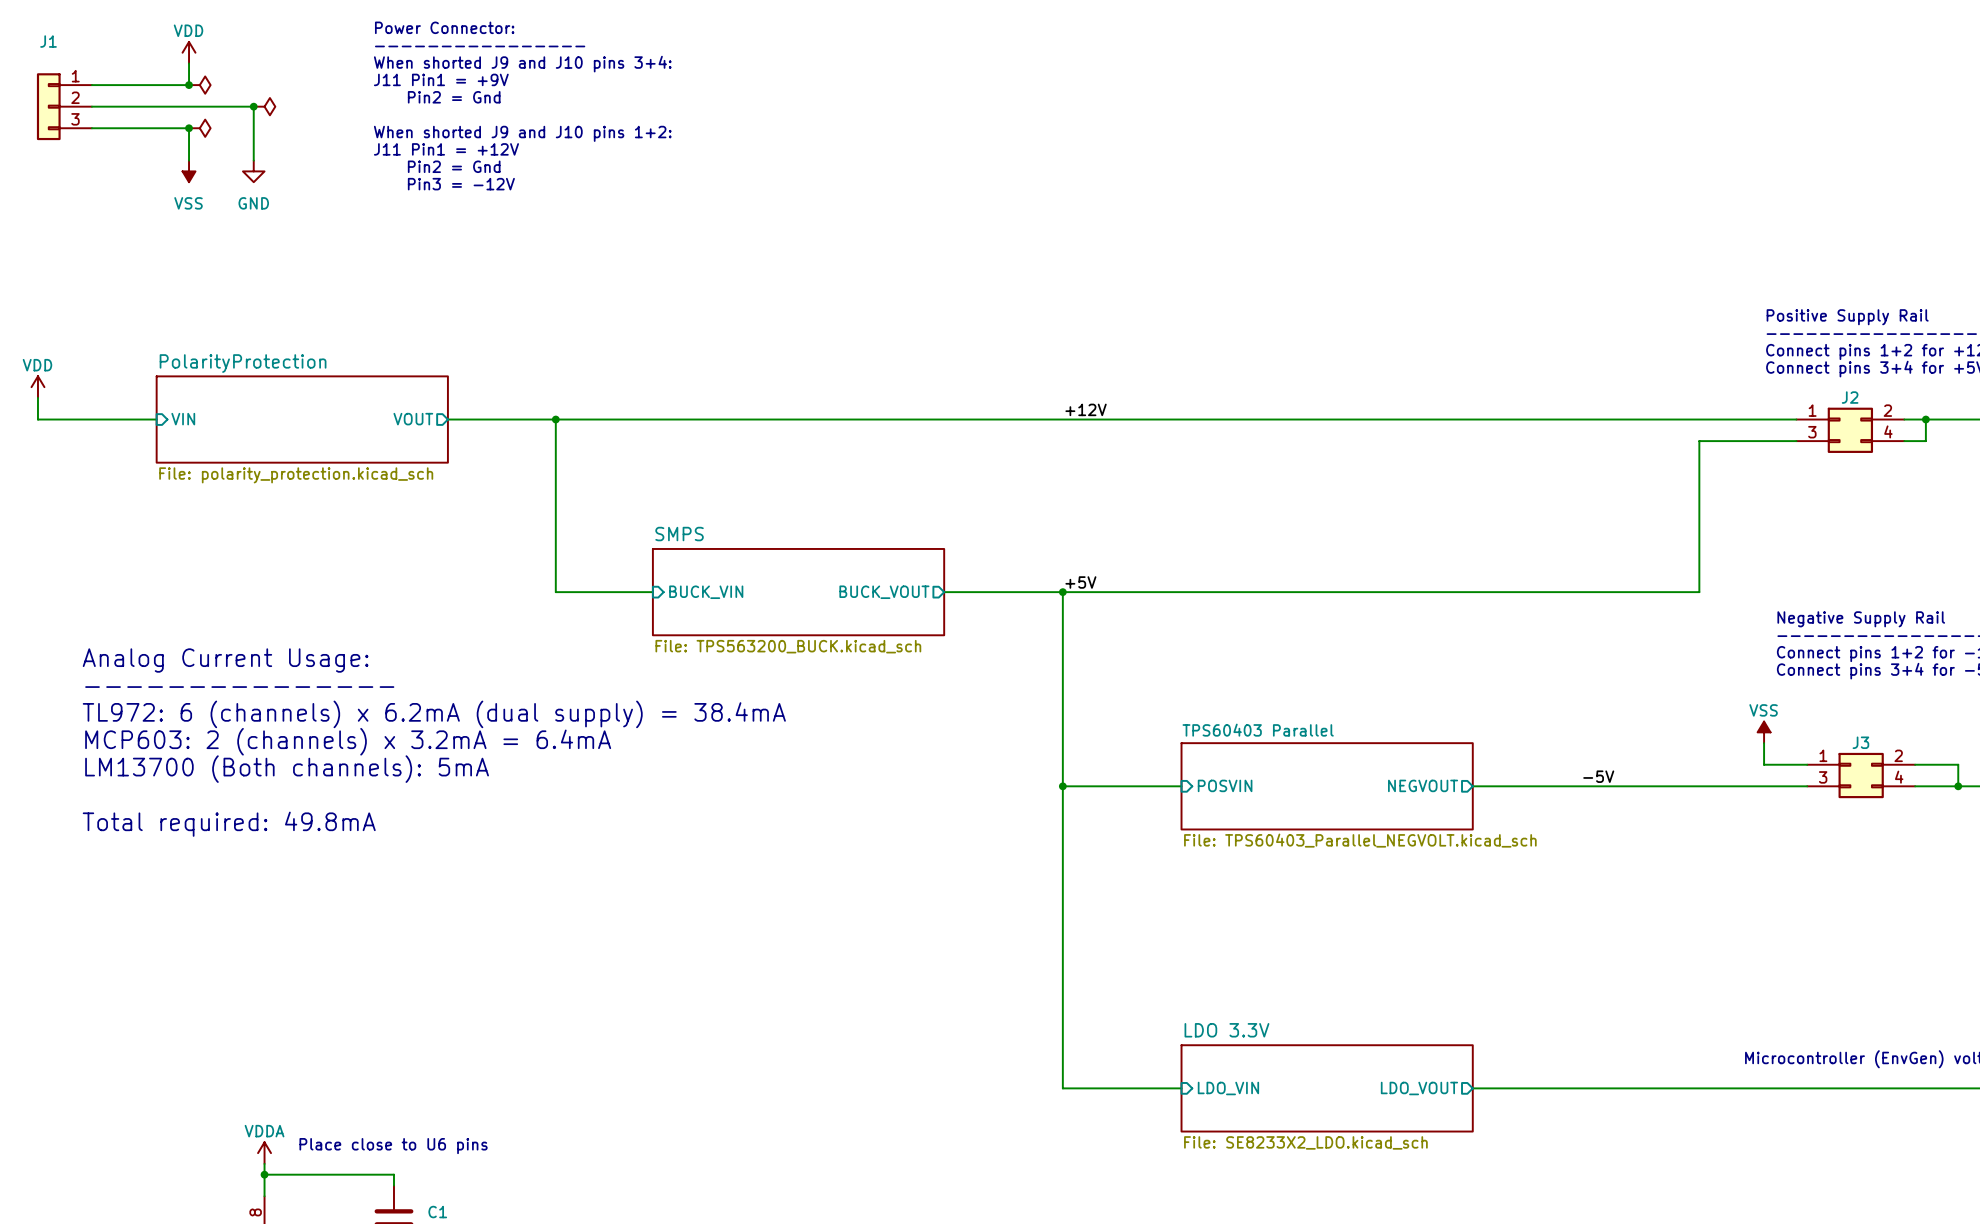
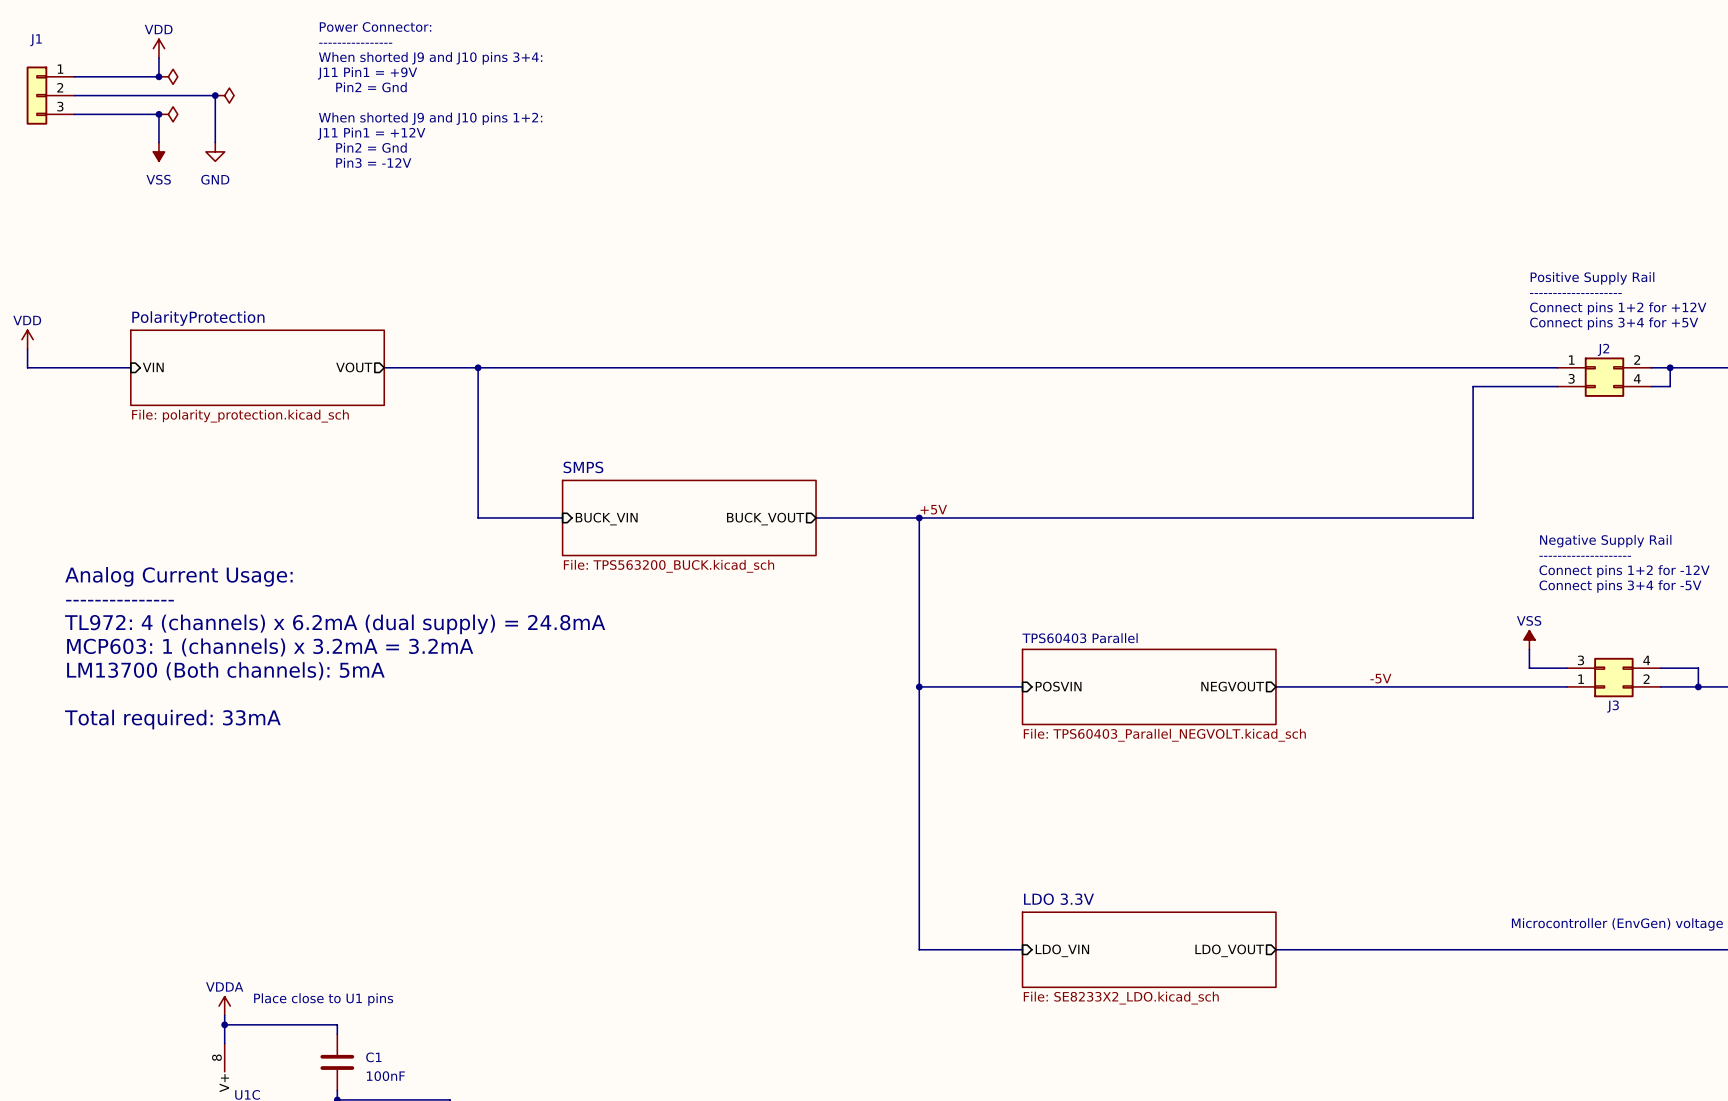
label: +12V (1086, 409) -> none
text: TL972: 6 (channels) x 6.2mA (dual supply) = 38.4mA (434, 714) -> TL972: 4 (channels) x 6.2mA (dual supply) = 24.8mA (335, 624)
text: MCP603: 2 (channels) x 3.2mA = 6.4mA (348, 741) -> MCP603: 1 (channels) x 3.2mA = 3.2mA (270, 647)
J3 flip: as is (1861, 775) -> up-down (1613, 677)
text: Total required: 49.8mA (229, 824) -> Total required: 33mA (172, 719)
text: Place close to U6 pins (393, 1146) -> Place close to U1 pins (323, 999)

